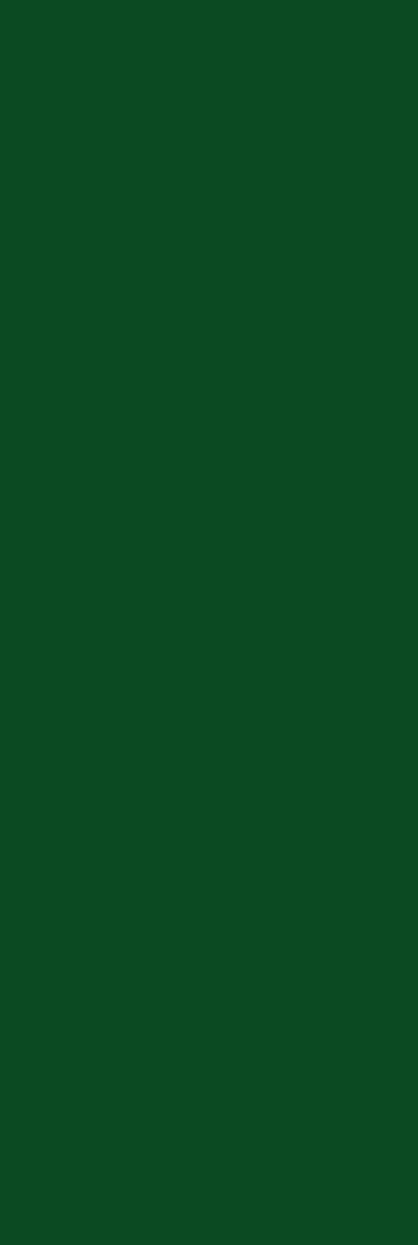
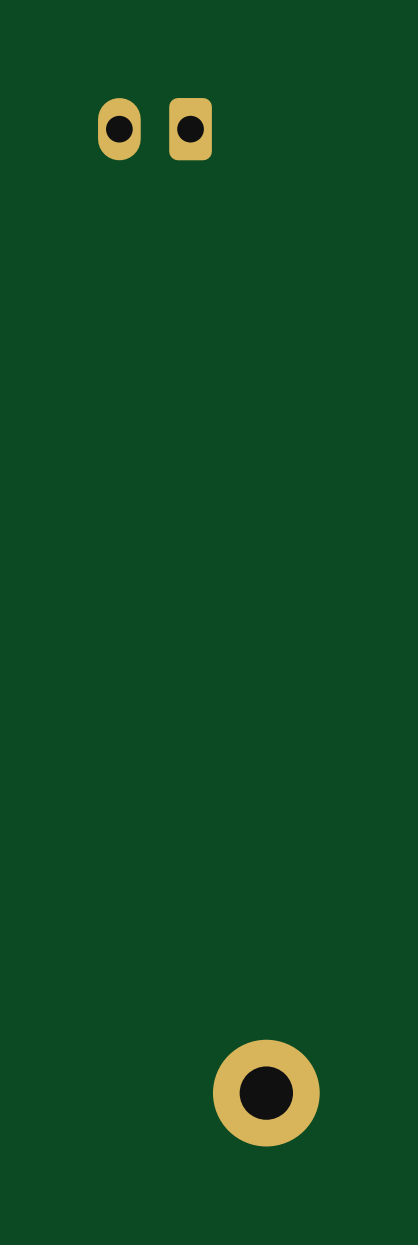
part: none -> (154, 129)
part: none -> (266, 1093)

